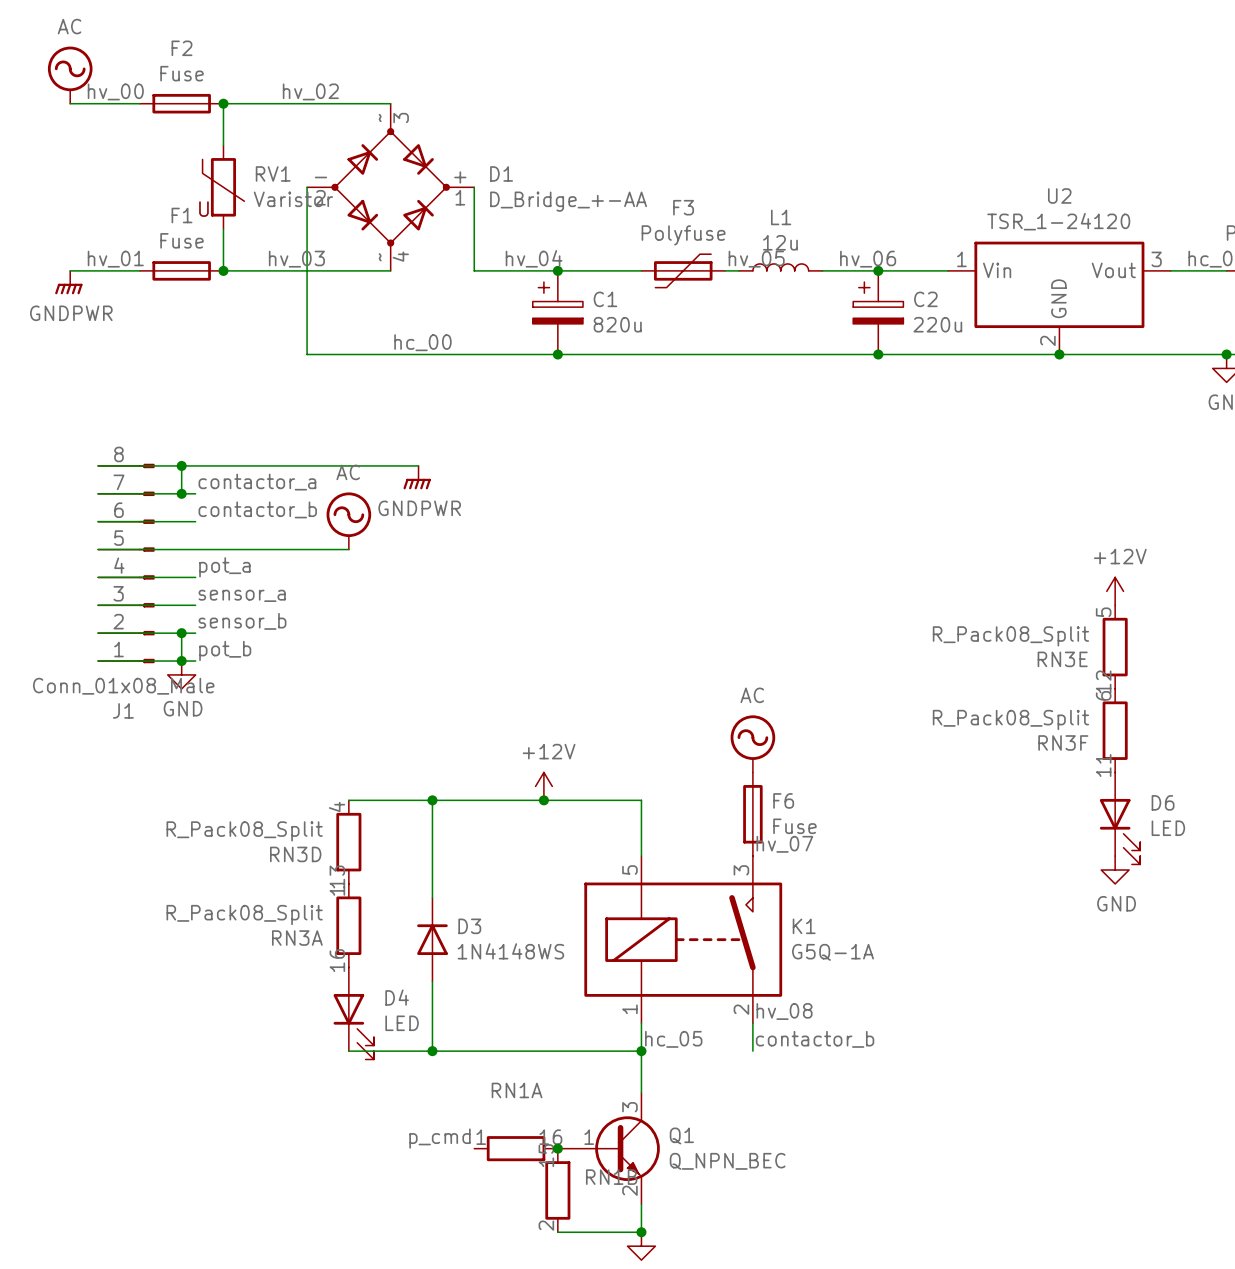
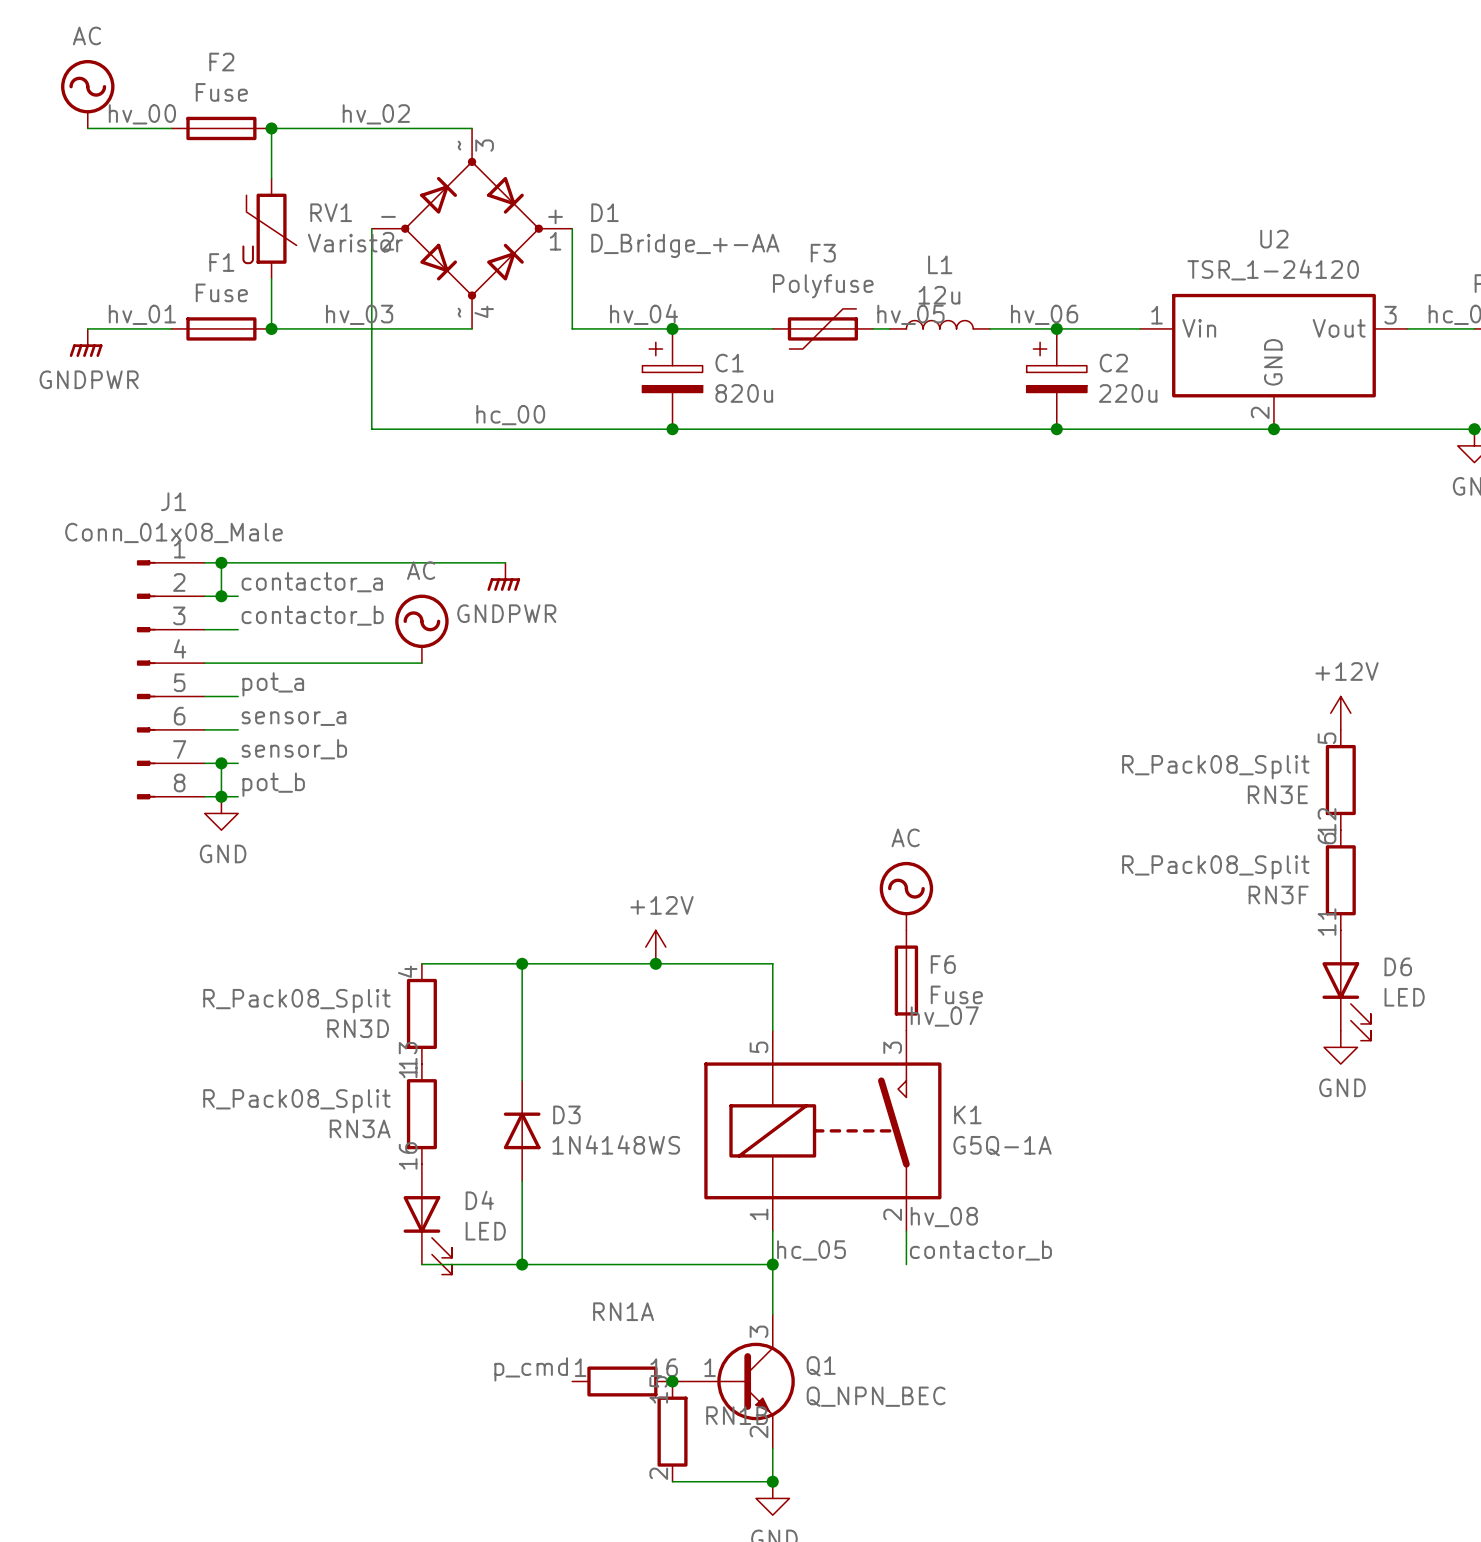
J1 rotation: 0° (146, 563) -> 180° (146, 679)

